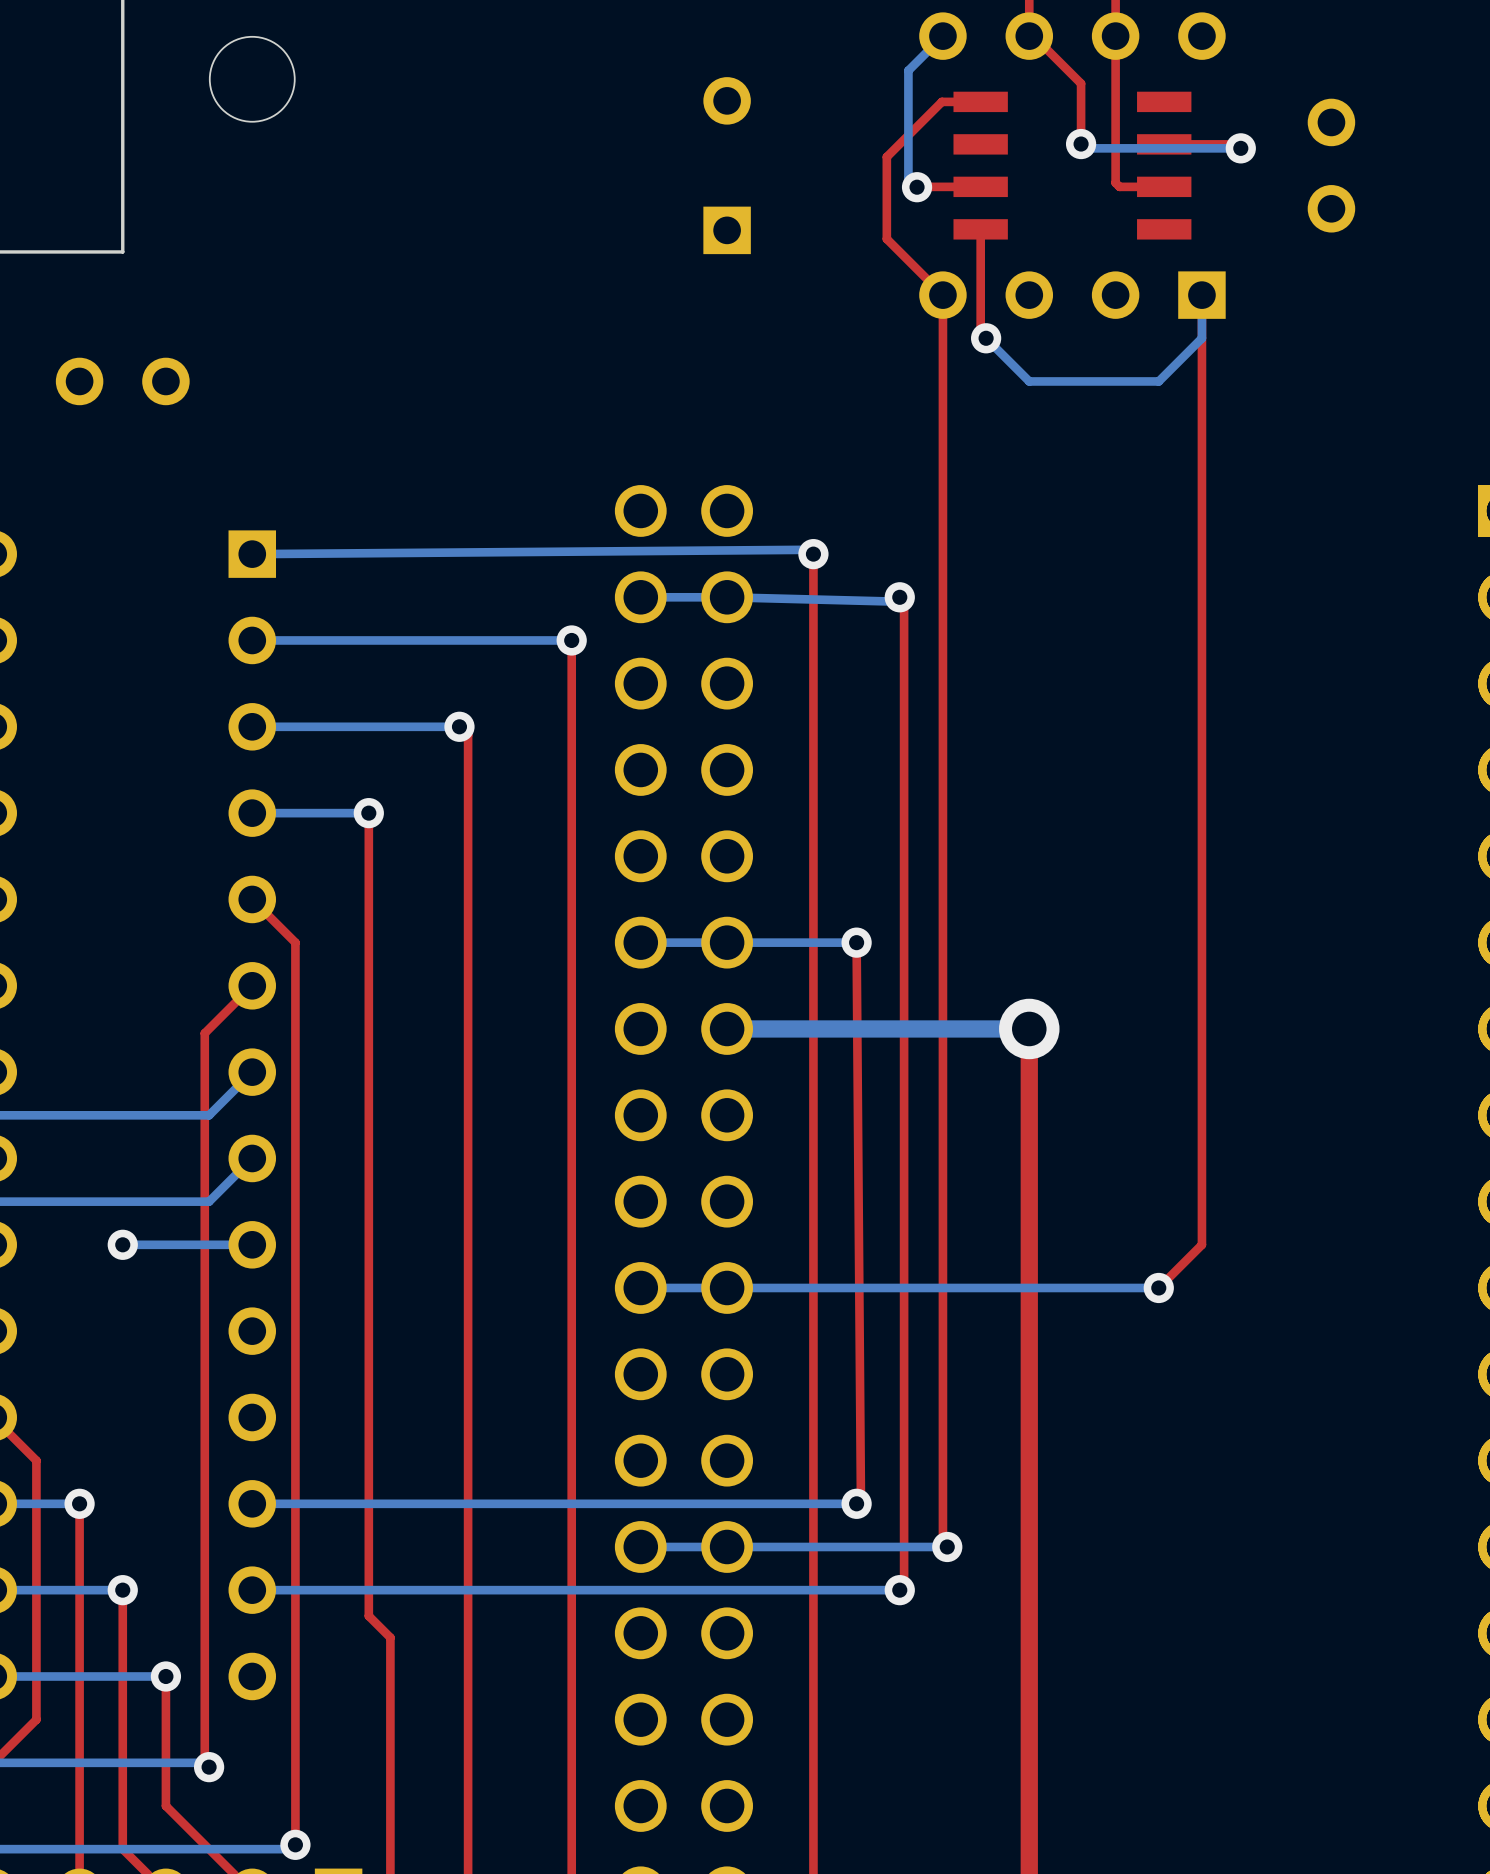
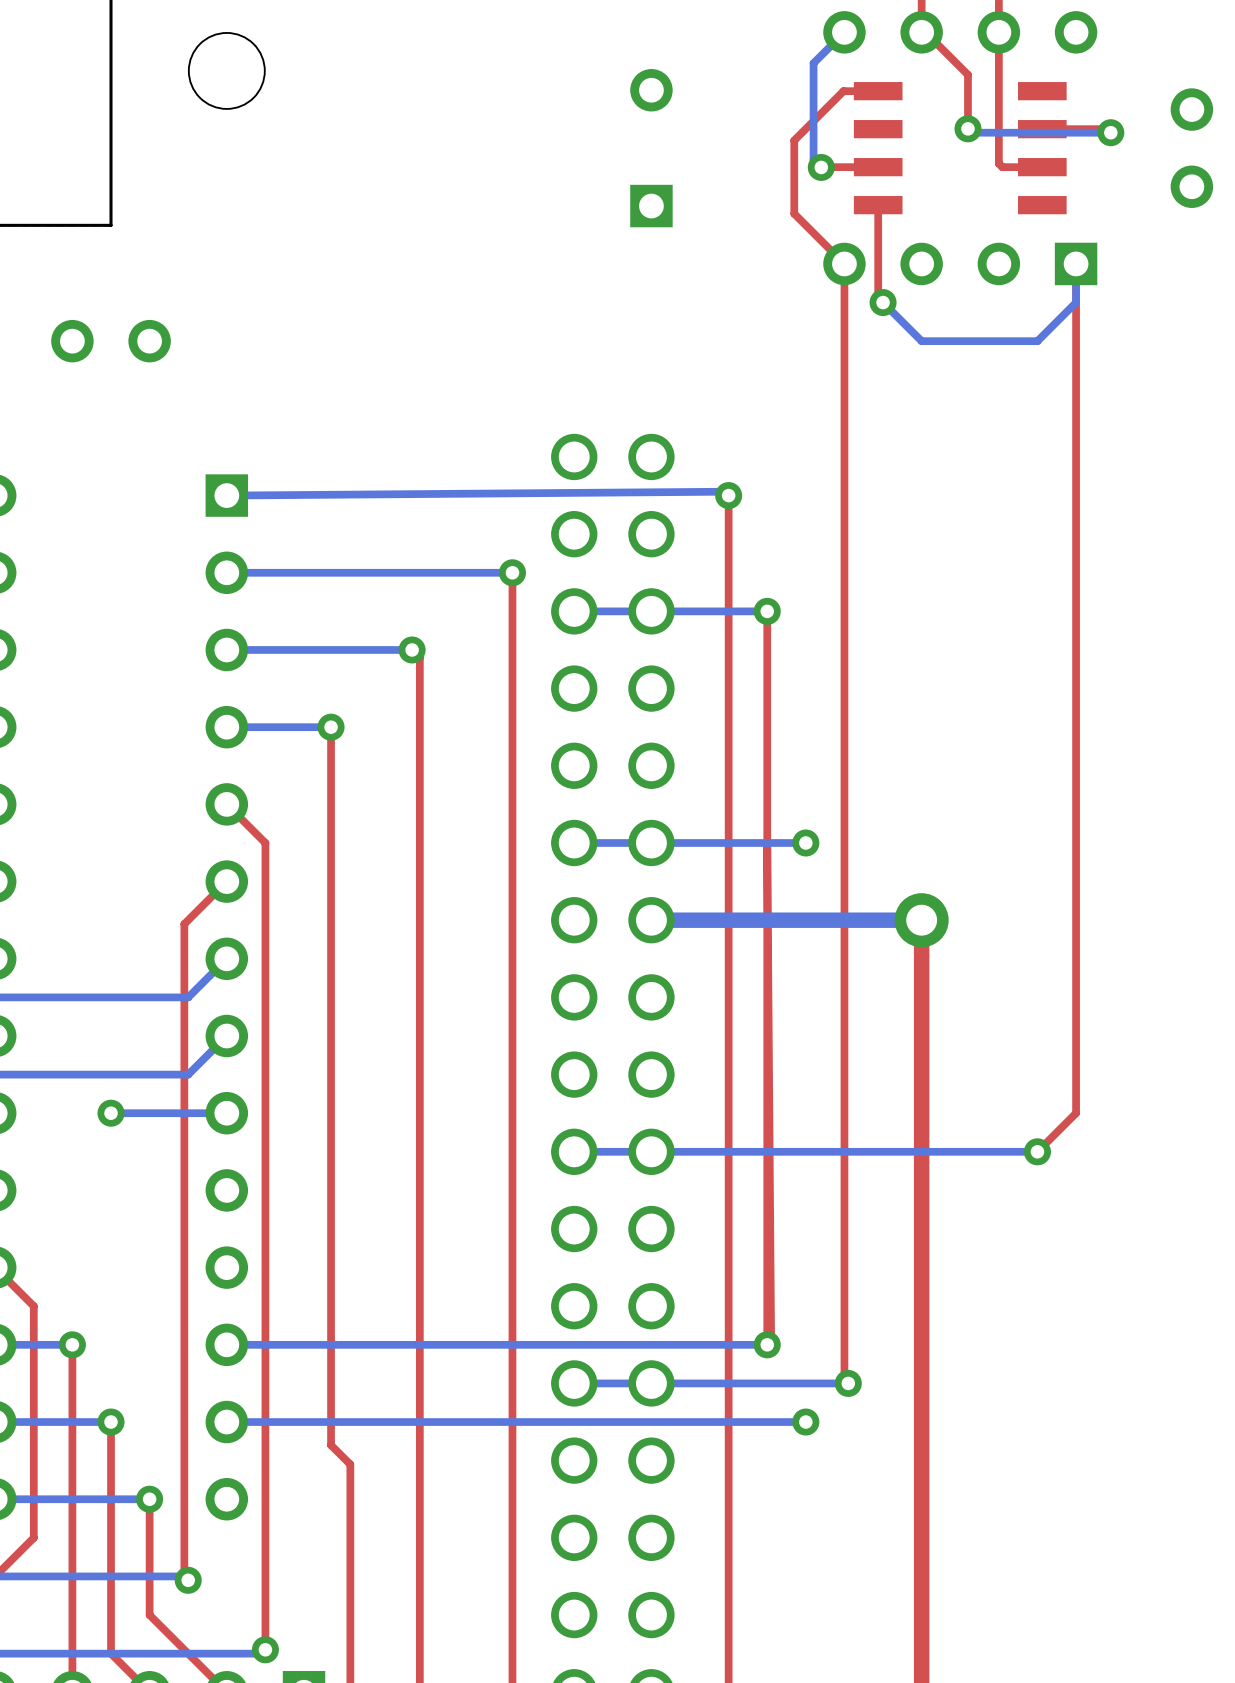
top track: (899, 597) (904, 601) (904, 1585) -> none
bottom track: (899, 597) (895, 601) (640, 597) -> none
via position: (899, 597) -> (767, 611)
top track: none -> (767, 611) (767, 1344)
bottom track: none -> (767, 611) (574, 611)
via position: (856, 942) -> (805, 842)
bottom track: none -> (805, 842) (767, 842)

